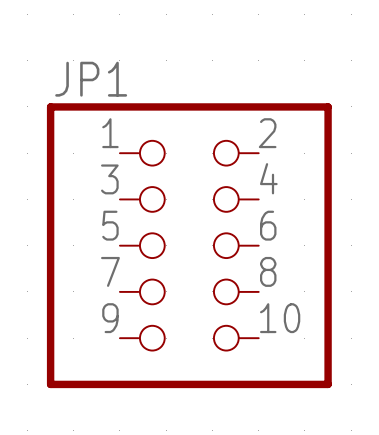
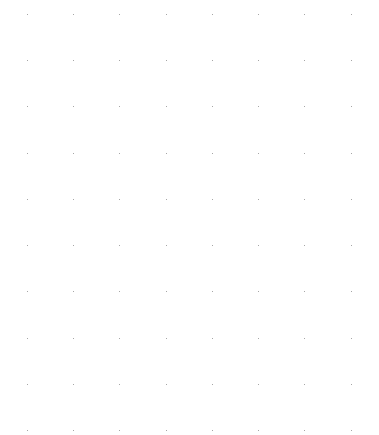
JP1: (189, 245) -> none

